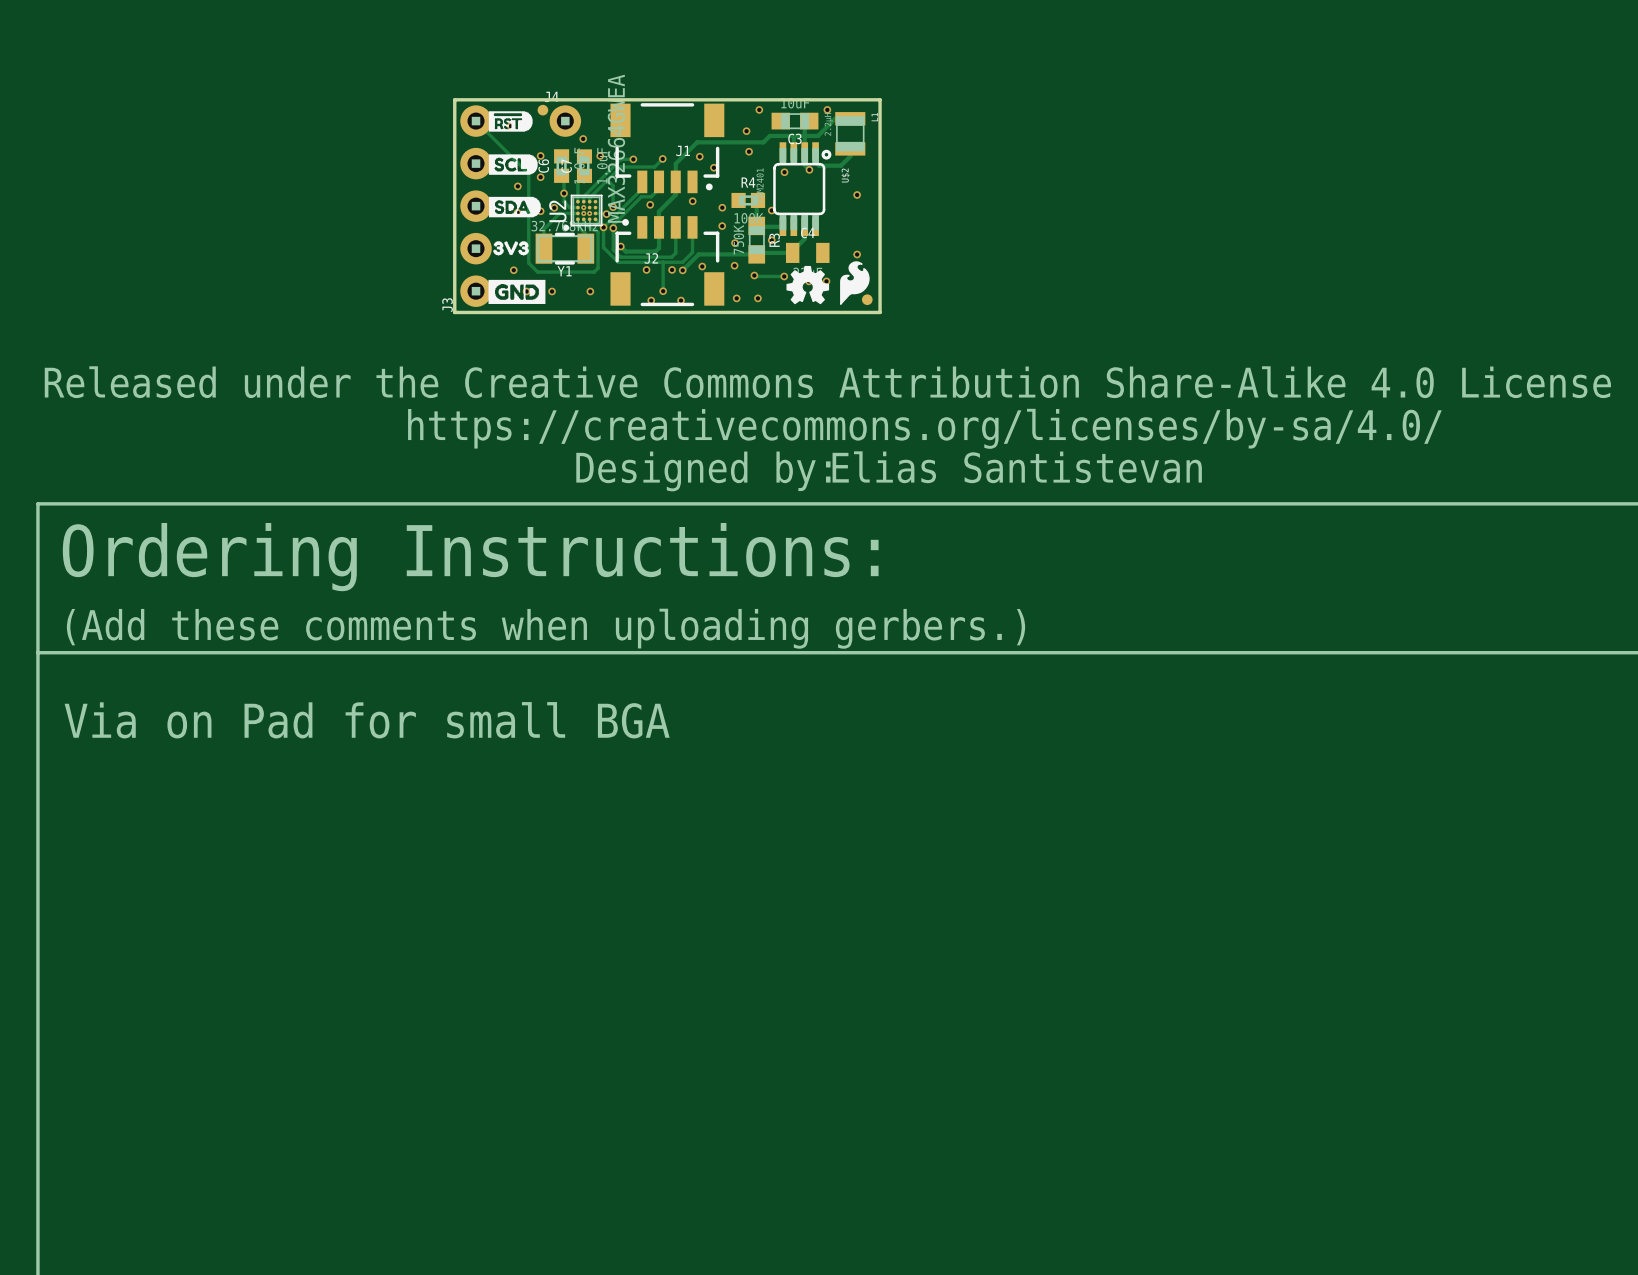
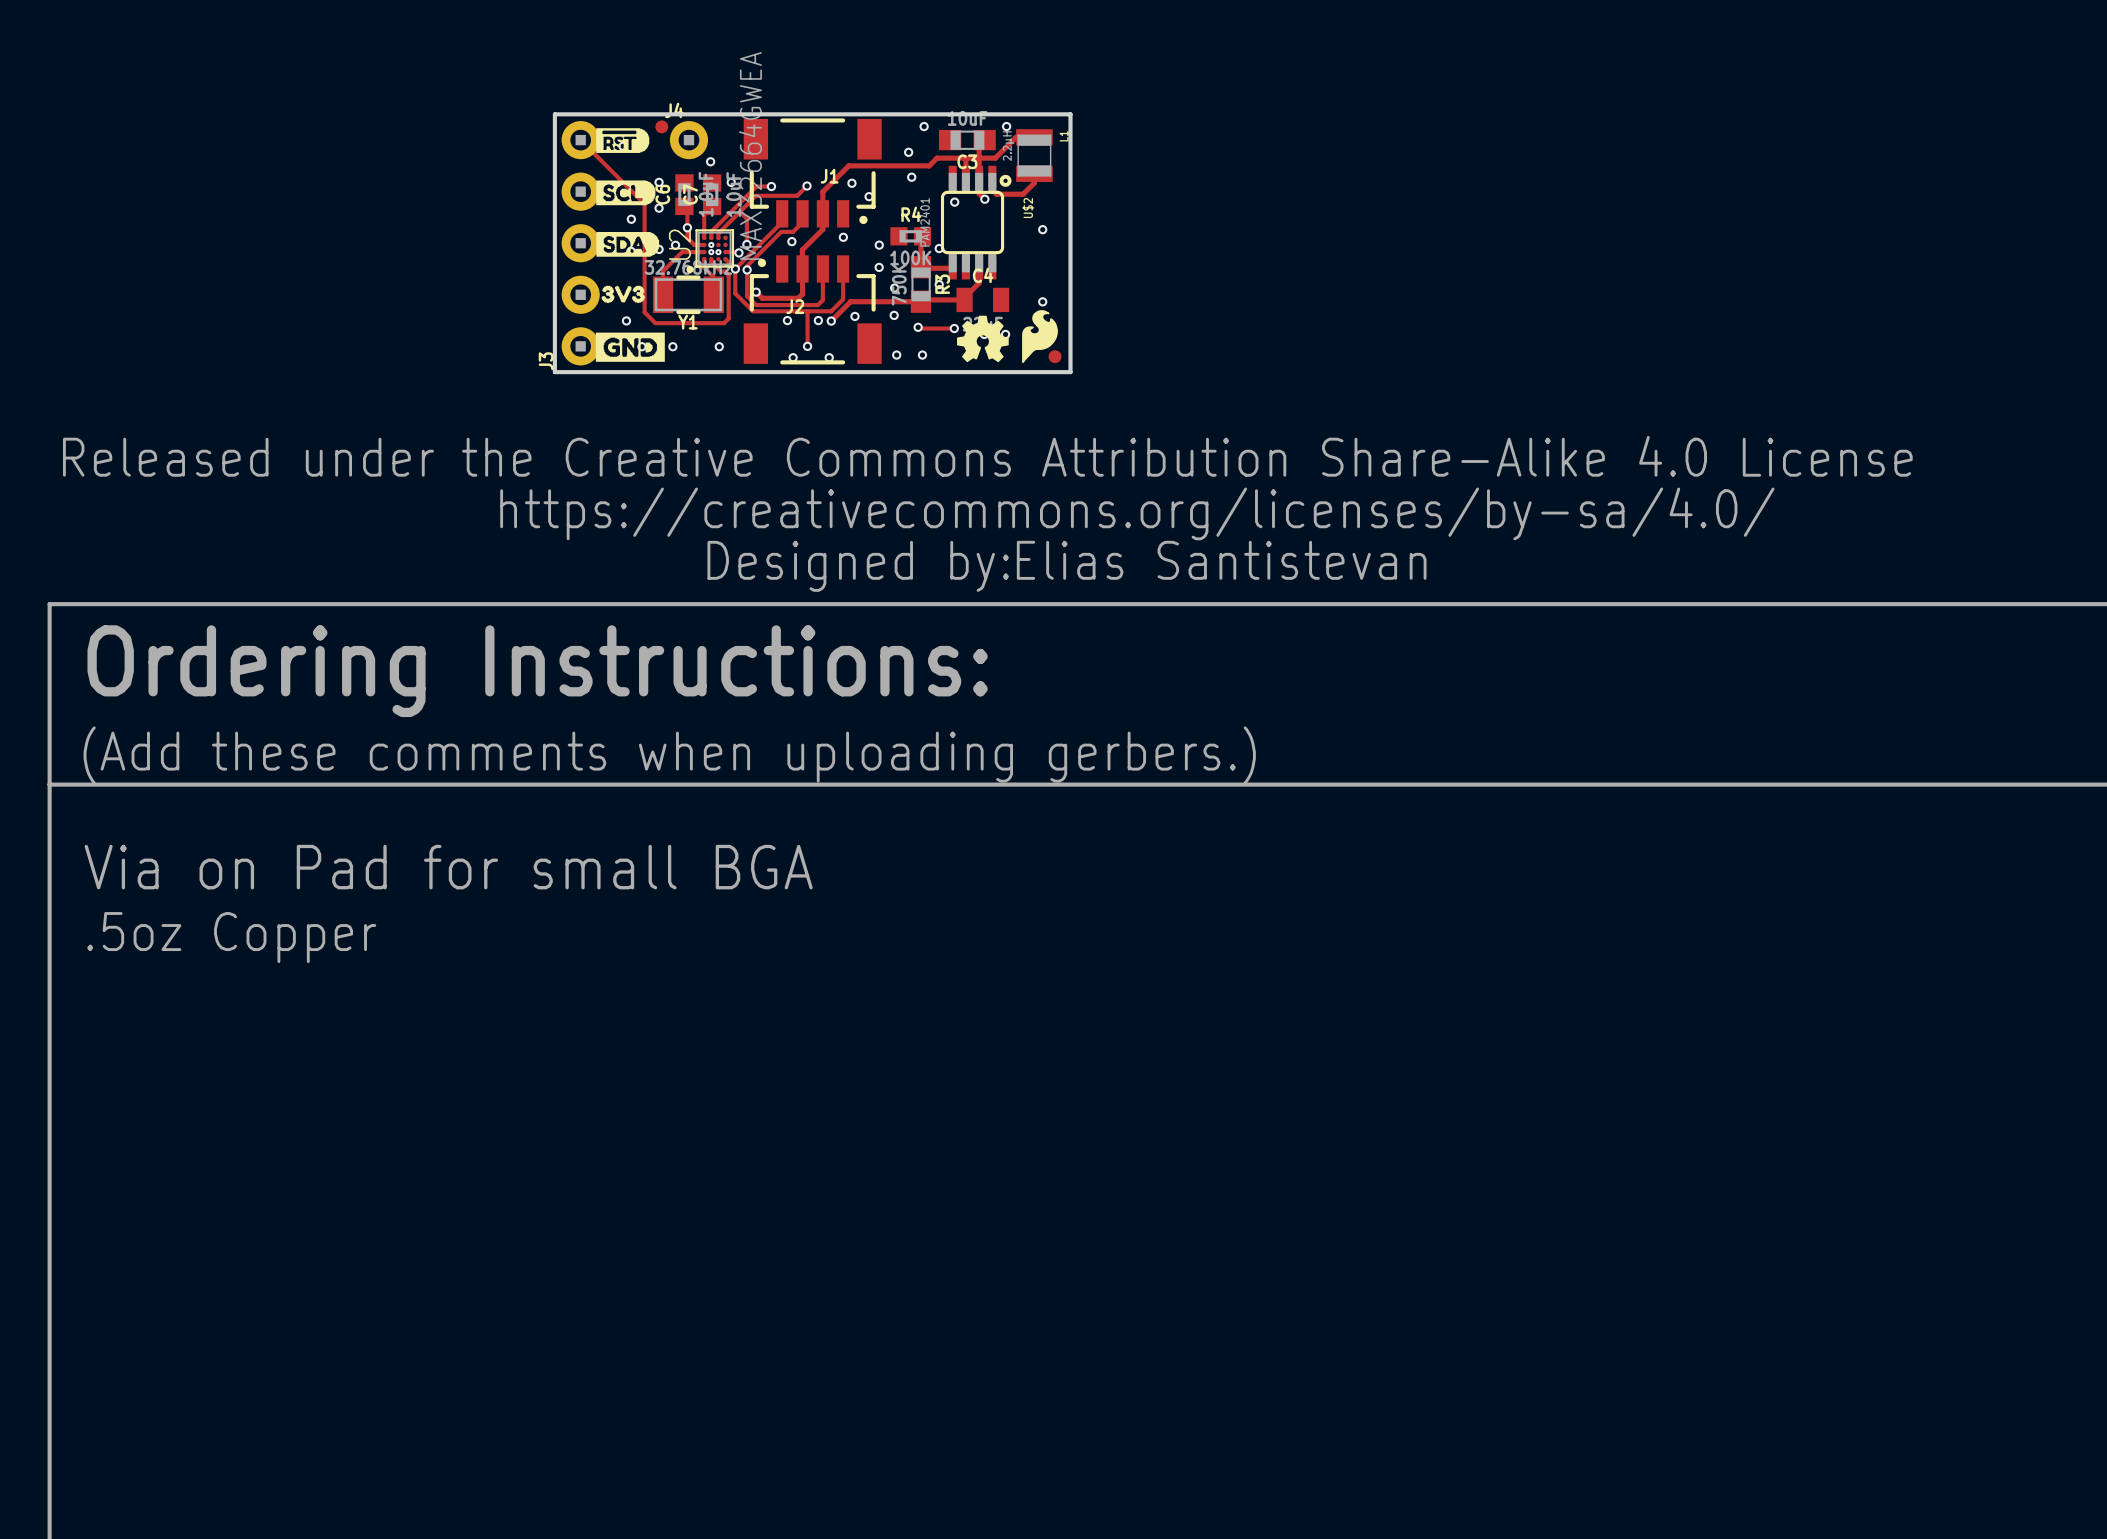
text: none -> .5oz Copper (231, 937)

